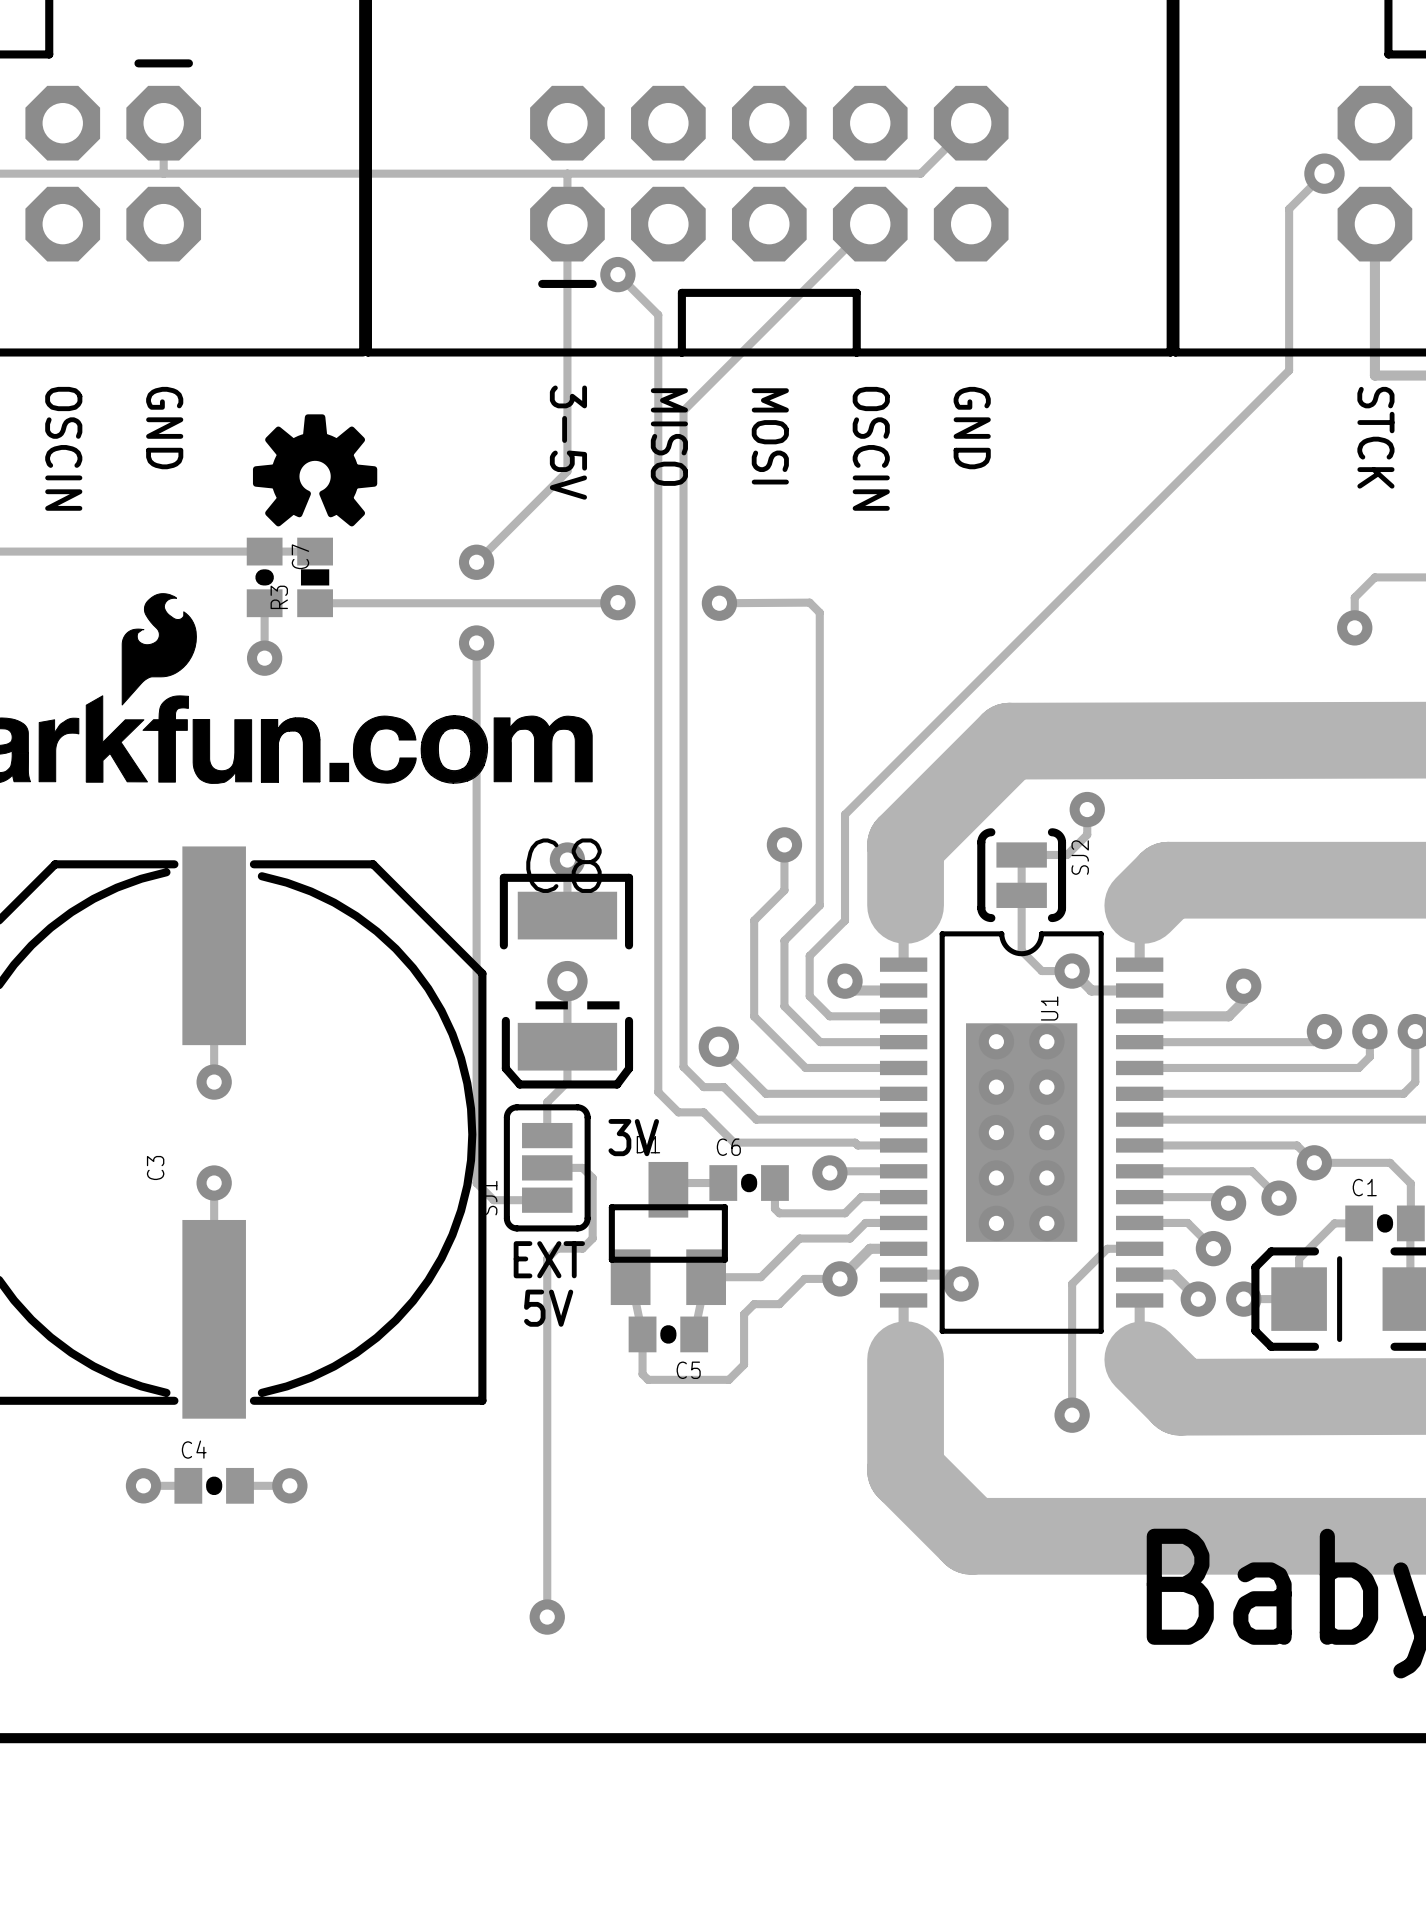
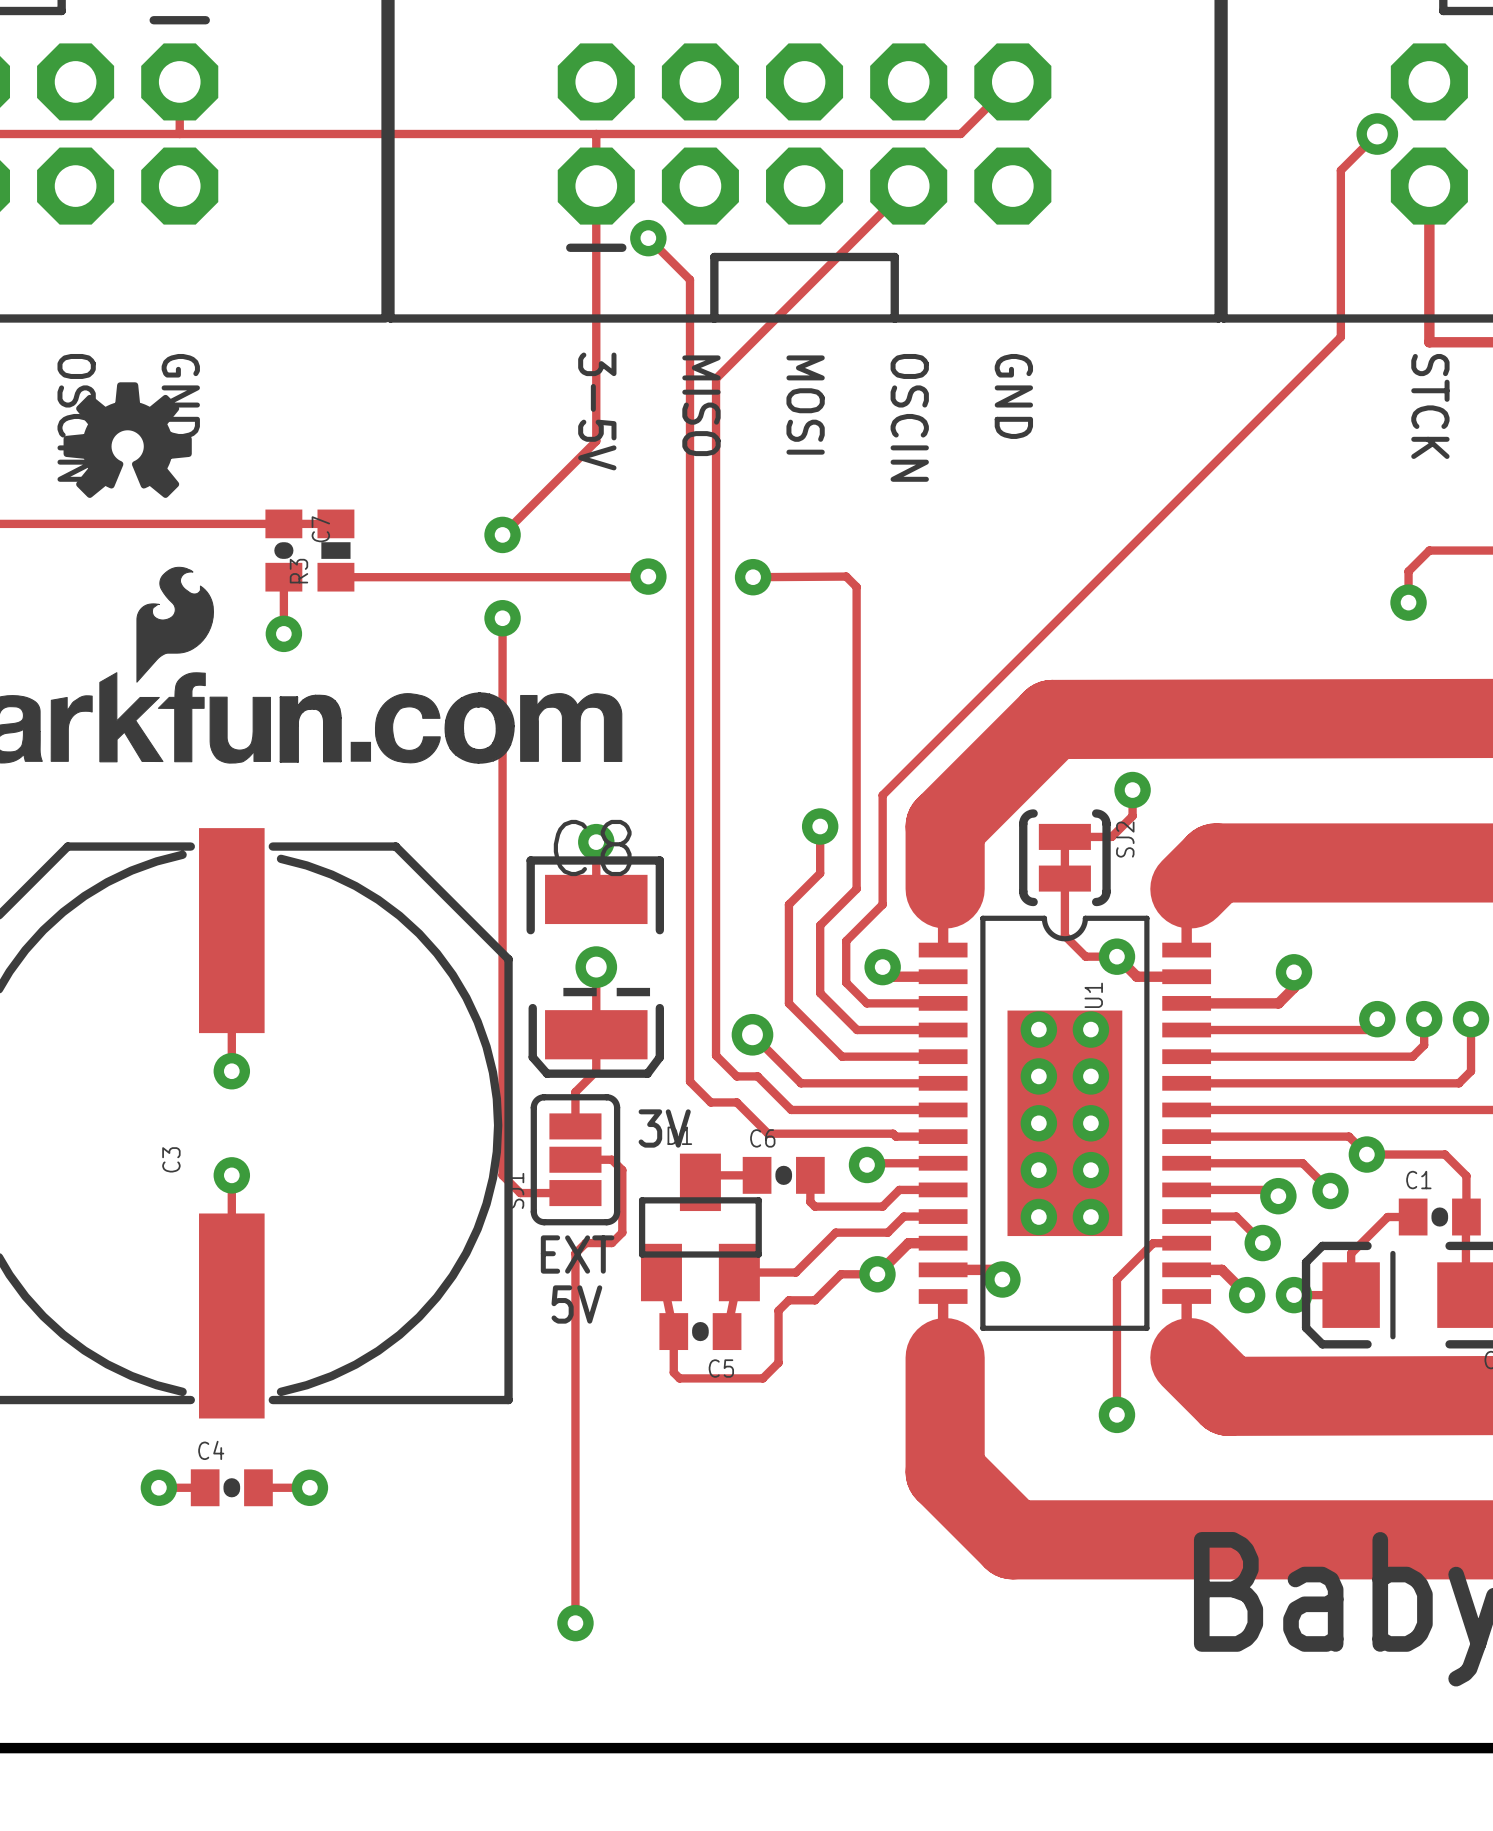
drawing position: (315, 470) -> (127, 440)

